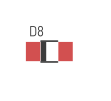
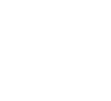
D8: (49, 51) -> none

